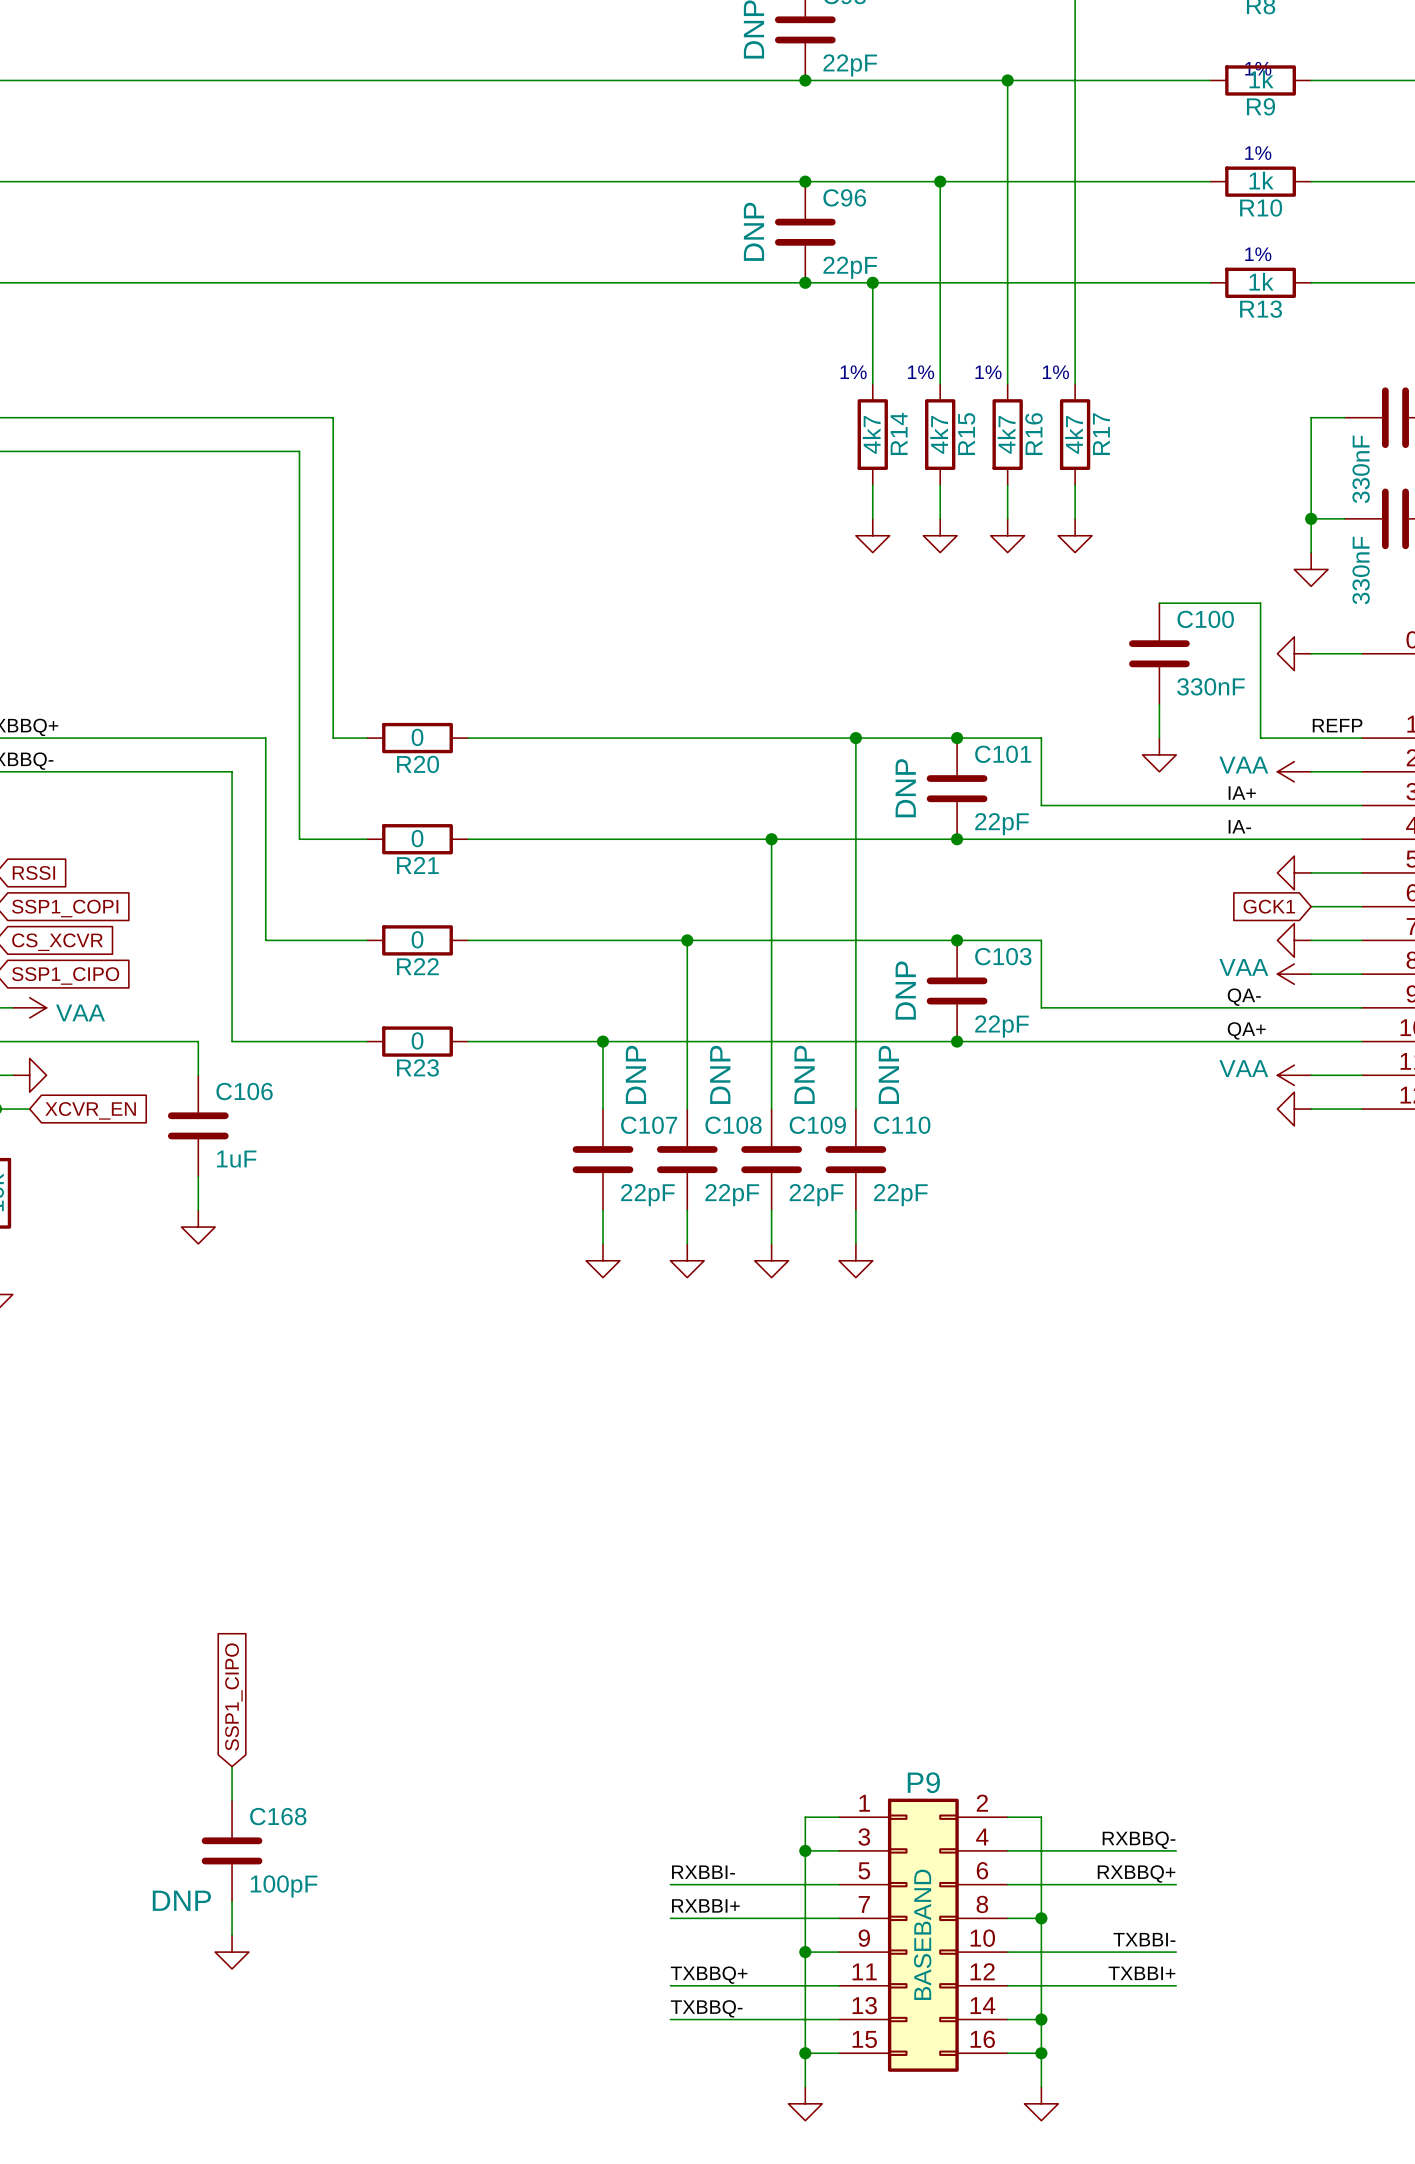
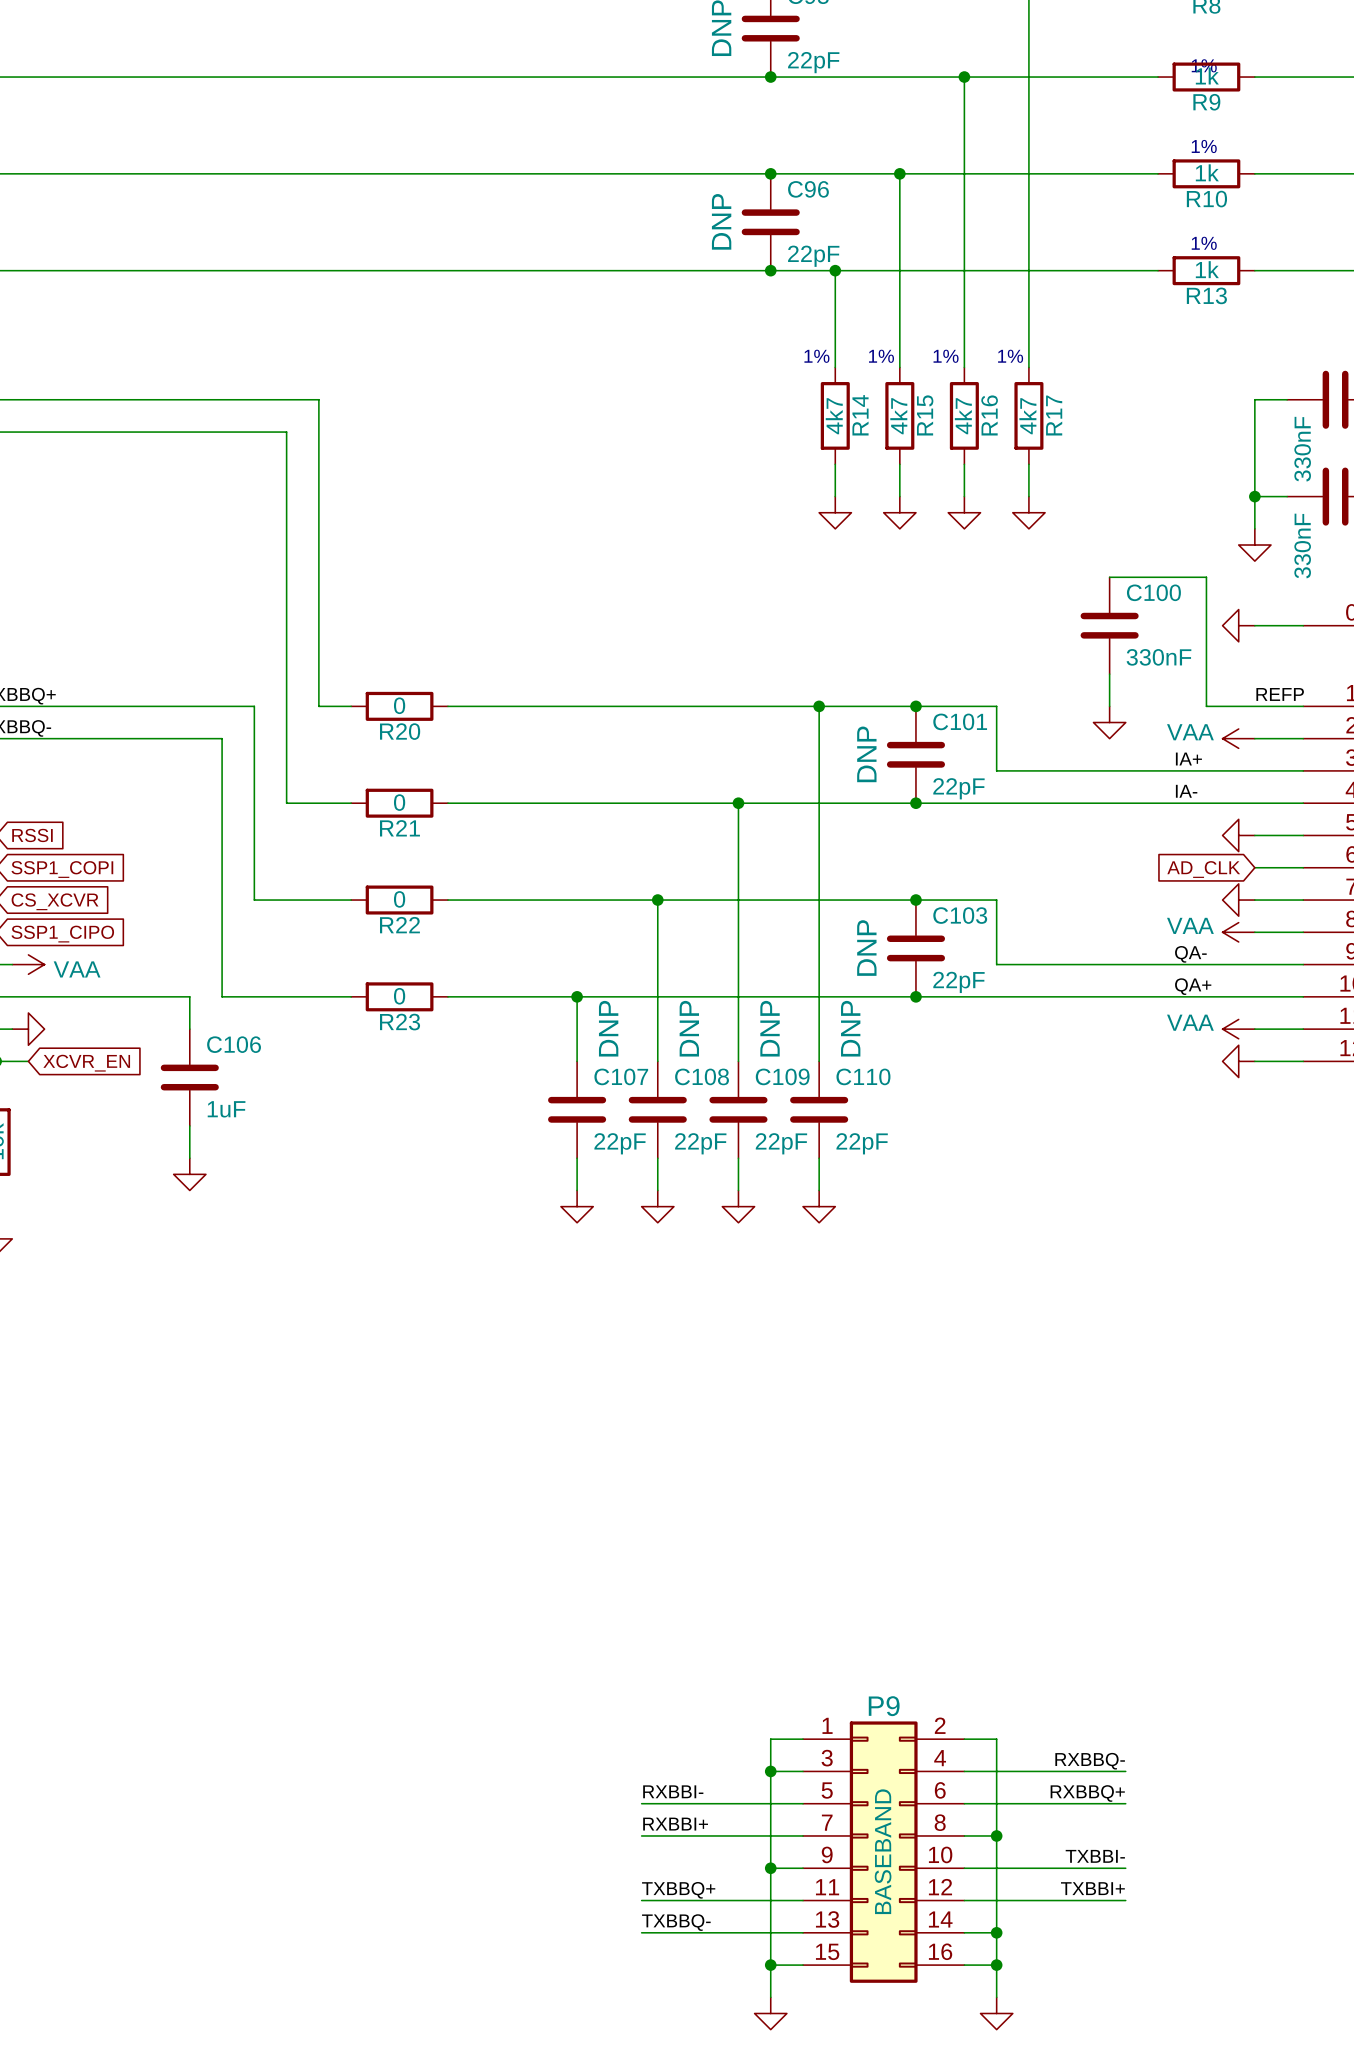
global label: GCK1 (1269, 906) -> AD_CLK (1203, 869)
global label: SSP1_CIPO (233, 1696) -> none
wire: (232, 1766) (232, 1800) -> none
C168: 100pF (232, 1850) -> none
wire: (232, 1901) (232, 1935) -> none
power symbol: (232, 1952) -> none

